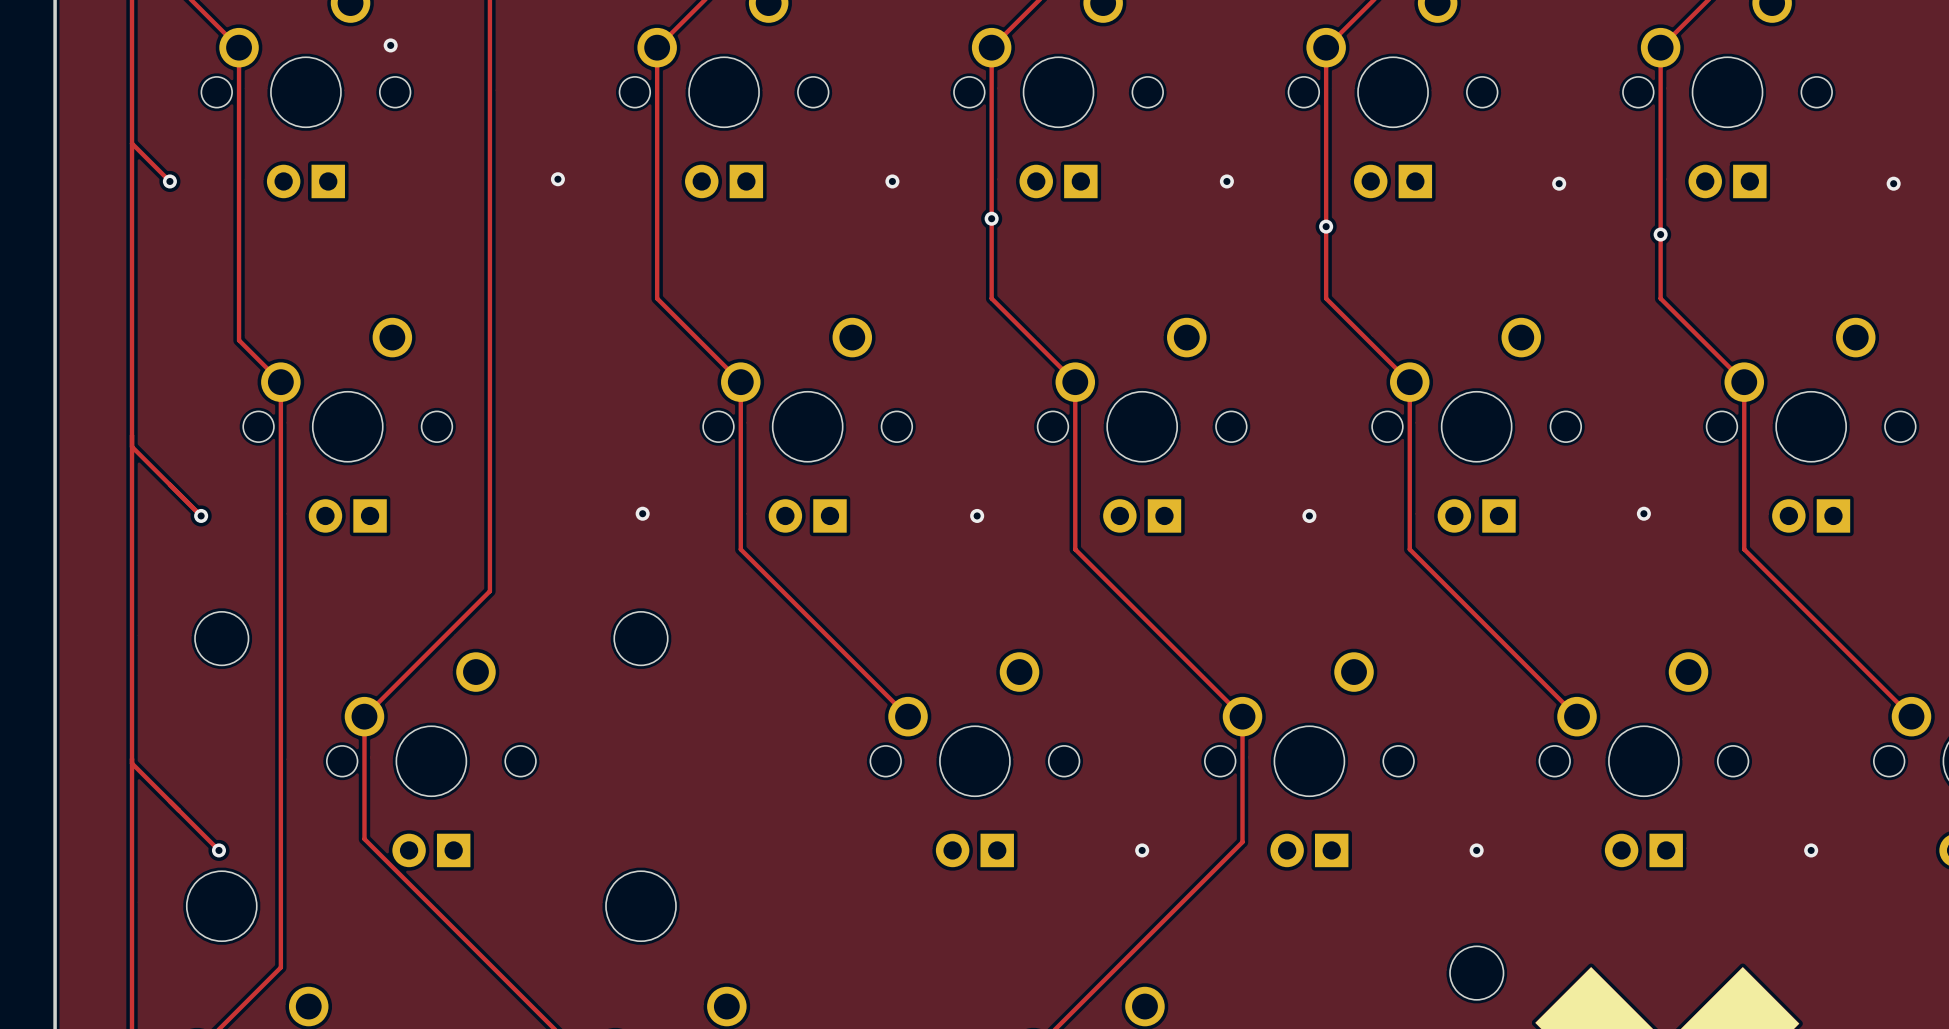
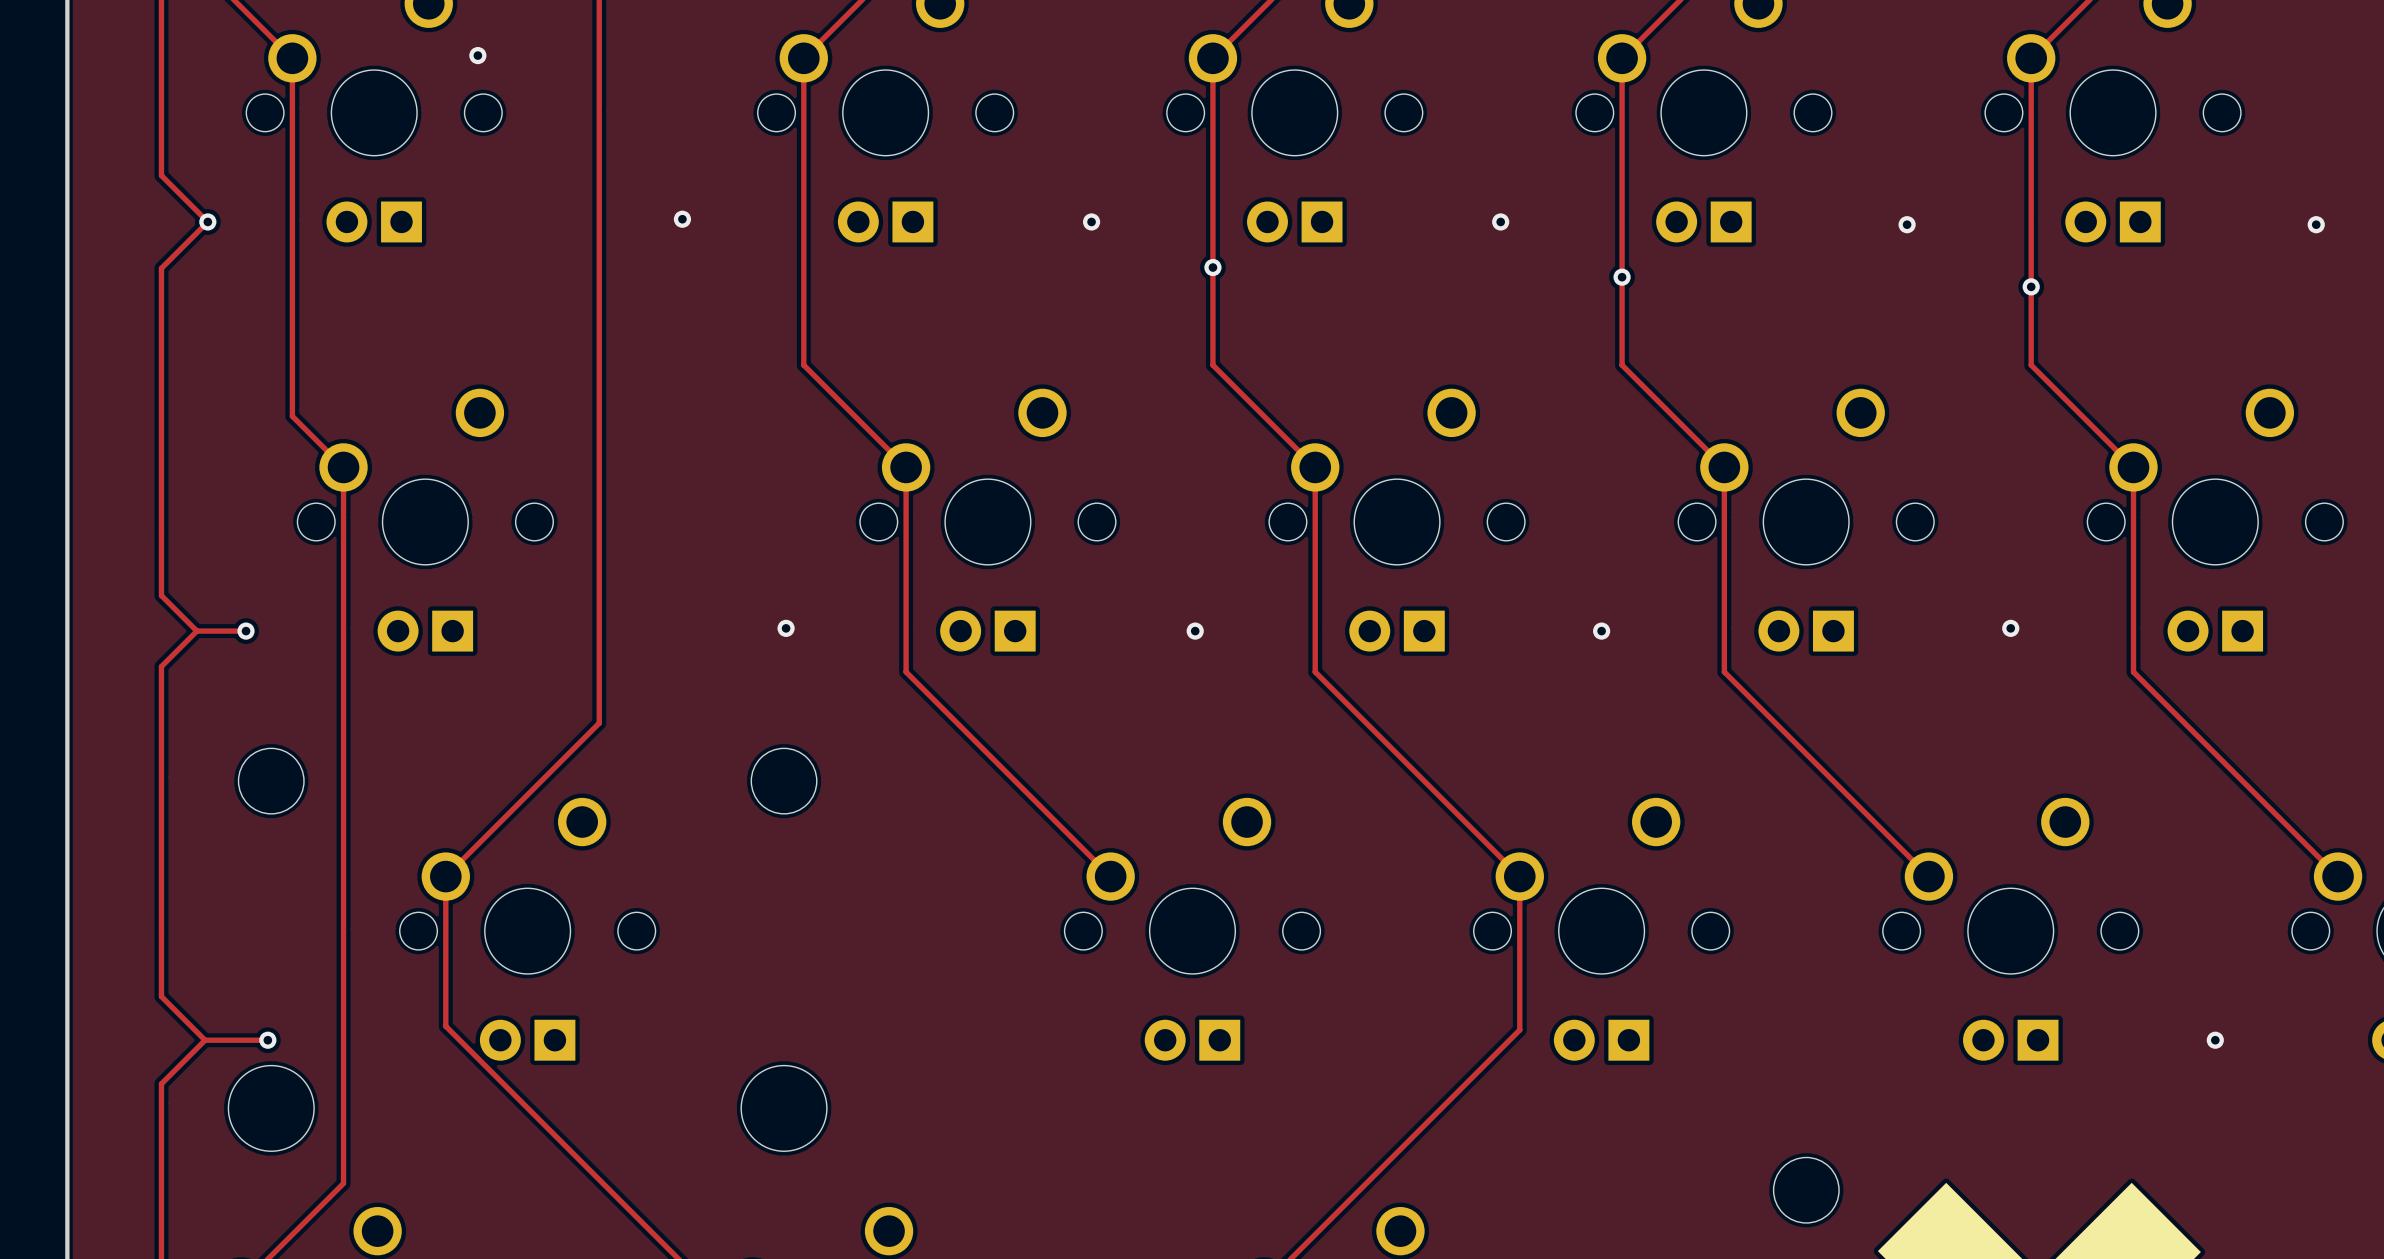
track: (132, 143) (132, 219) -> (207, 221) (161, 268)
track: (132, 446) (201, 515) -> (196, 631) (246, 631)
track: (132, 486) (132, 544) -> (161, 595) (196, 631)
track: none -> (196, 631) (161, 666)
track: (132, 763) (218, 850) -> (205, 1040) (267, 1040)
track: (132, 814) (132, 886) -> (205, 1040) (161, 1083)
track: none -> (161, 996) (205, 1040)
via: (1142, 850) -> none
via: (1476, 850) -> none

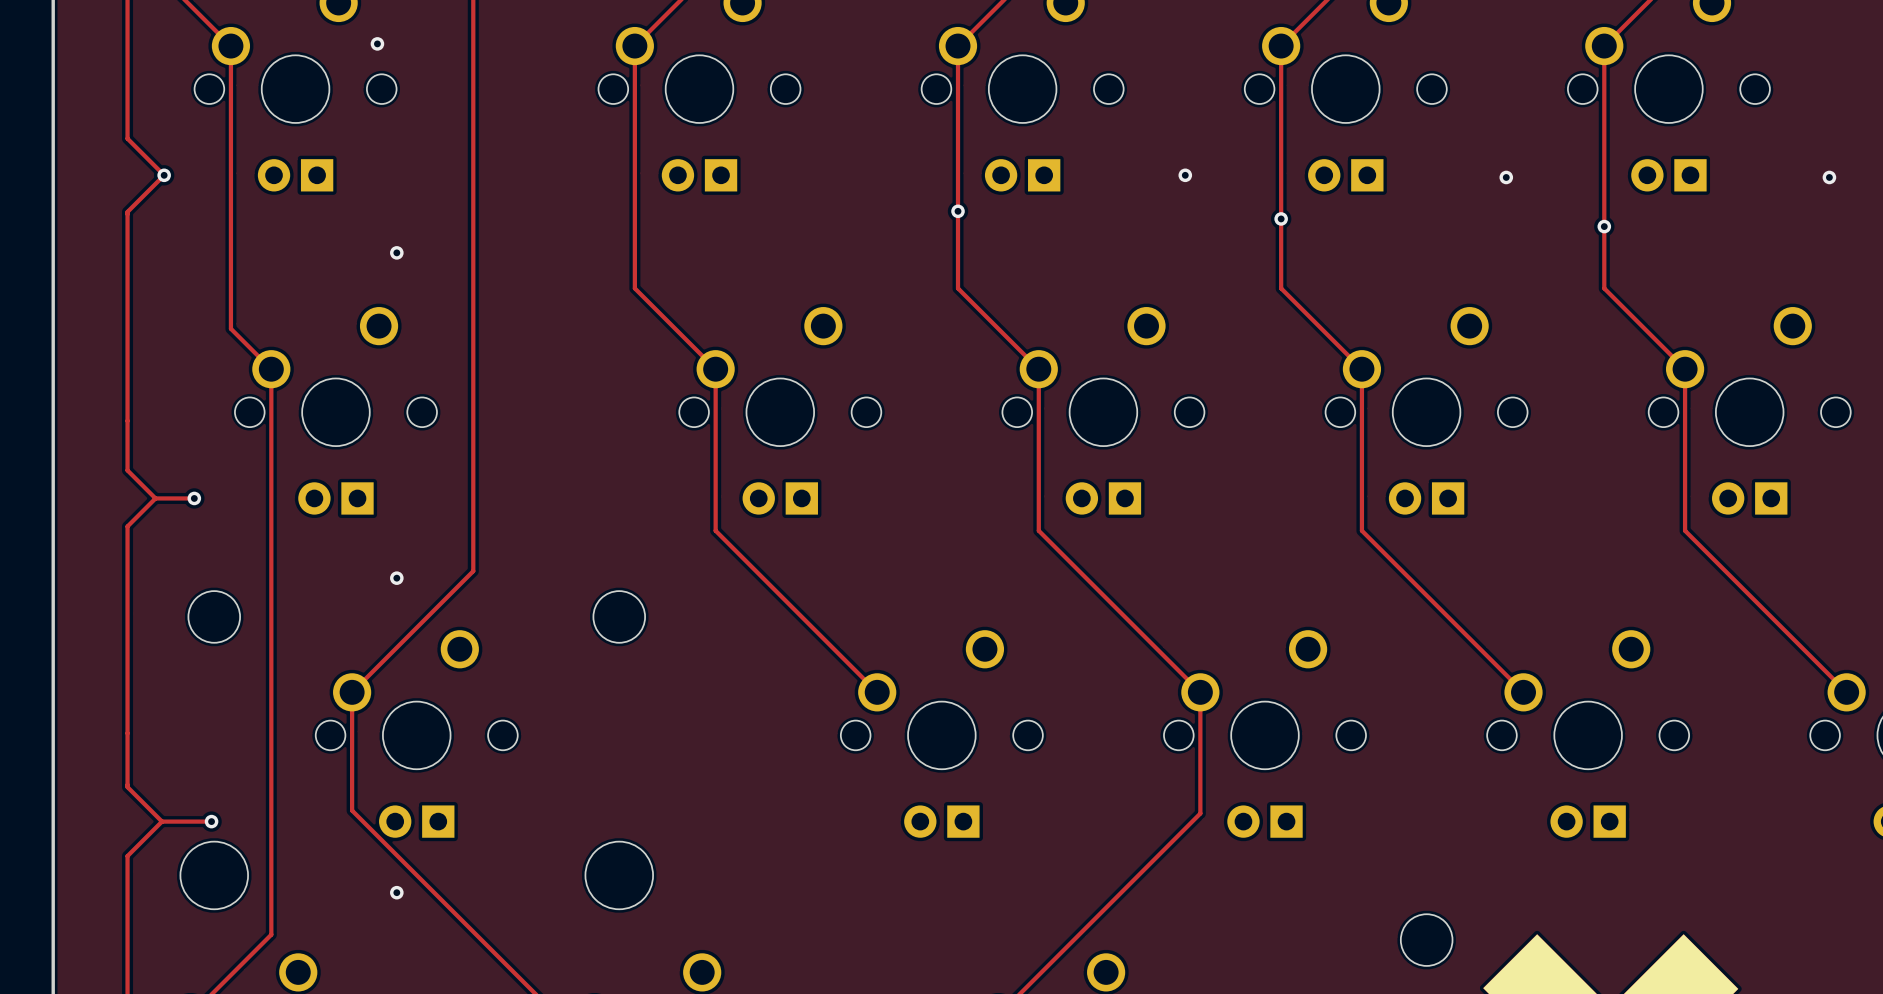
via: (682, 219) -> none
via: (1091, 221) -> none
via: none -> (396, 252)
via: (786, 628) -> none
via: (2010, 628) -> none
via: (1195, 631) -> none
via: (1601, 631) -> none
via: none -> (396, 578)
via: (2215, 1040) -> none
via: none -> (396, 892)

